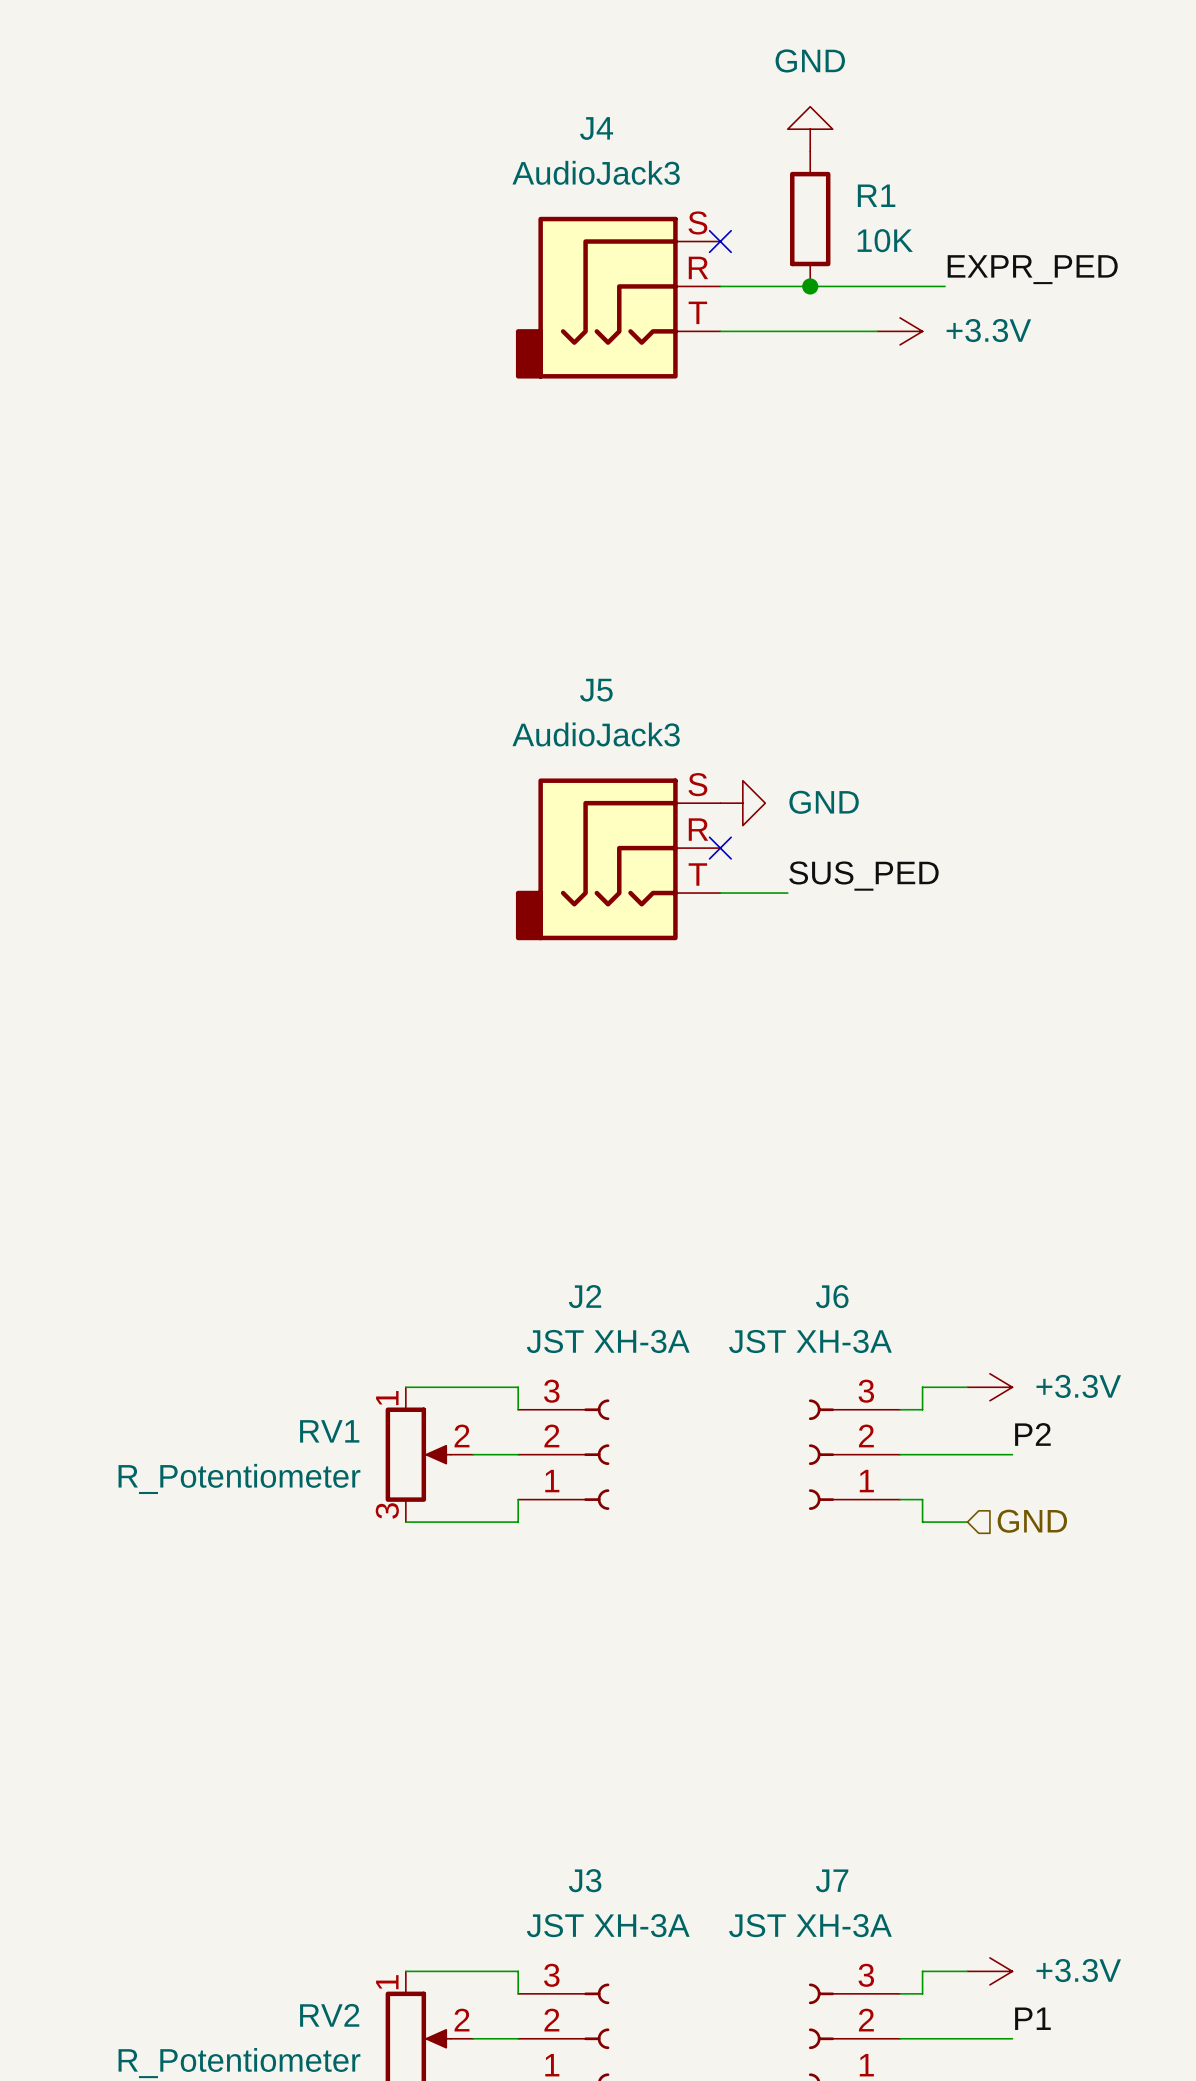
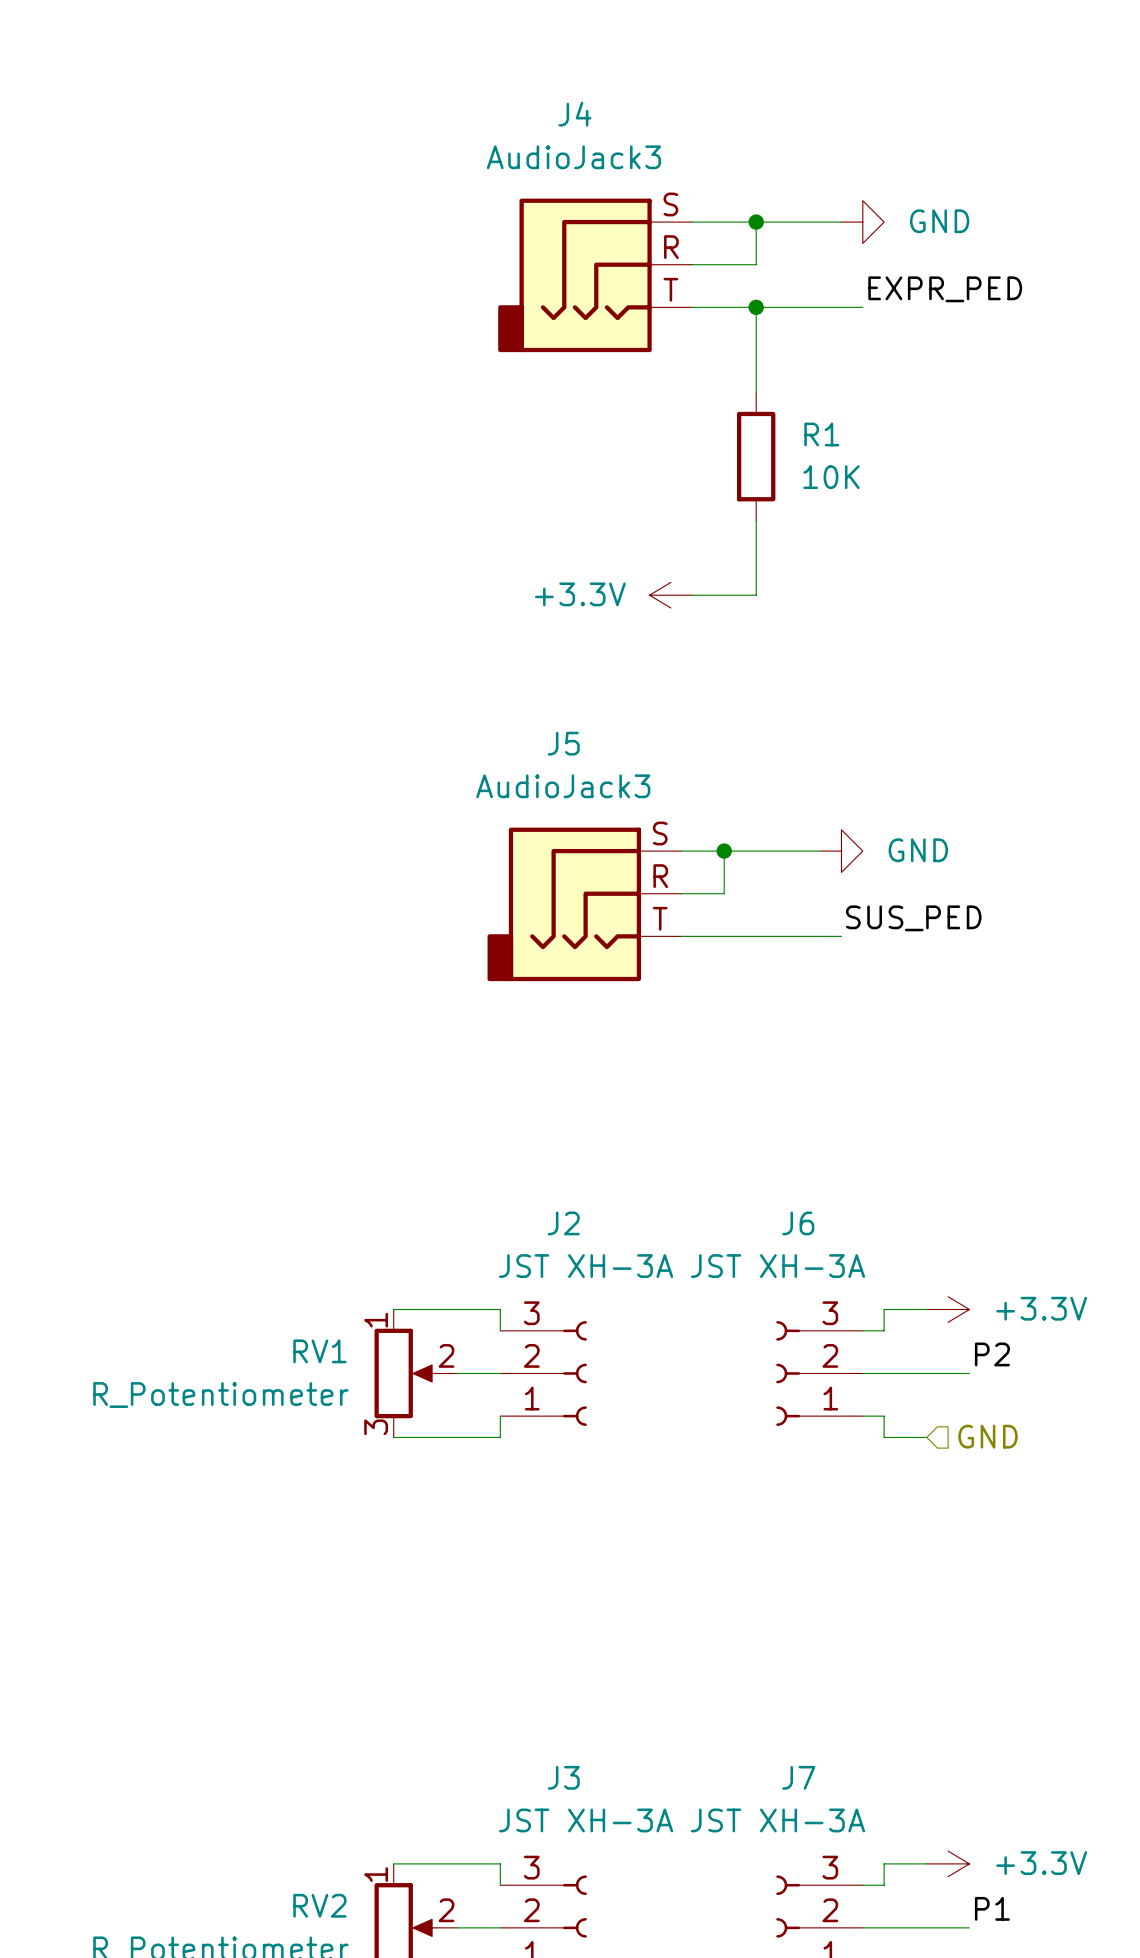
power symbol rotation: 0° (810, 129) -> 90° clockwise (862, 222)
power symbol position: GND (810, 129) -> GND (862, 222)
R1 position: (810, 219) -> (756, 456)
wire: none -> (692, 222) (841, 222)
no-connect mark: (720, 241) -> none
junction: none -> (756, 222)
label position: EXPR_PED (1032, 269) -> EXPR_PED (945, 289)
wire: (787, 286) (945, 286) -> (756, 264) (756, 222)
junction: (810, 286) -> none
wire: none -> (756, 307) (756, 392)
junction: none -> (756, 307)
power symbol rotation: 0° (900, 331) -> 180° (670, 595)
power symbol position: +3.3V (900, 331) -> +3.3V (670, 595)
wire: none -> (756, 520) (756, 595) (692, 595)
power symbol position: GND (742, 803) -> GND (841, 851)
no-connect mark: (720, 848) -> none
J5 position: (618, 859) -> (584, 904)
label position: SUS_PED (863, 876) -> SUS_PED (913, 918)
wire: (720, 893) (787, 893) -> none
wire: none -> (681, 851) (820, 851)
wire: none -> (724, 851) (724, 893) (681, 893)
junction: none -> (724, 851)
wire: none -> (681, 936) (841, 936)

